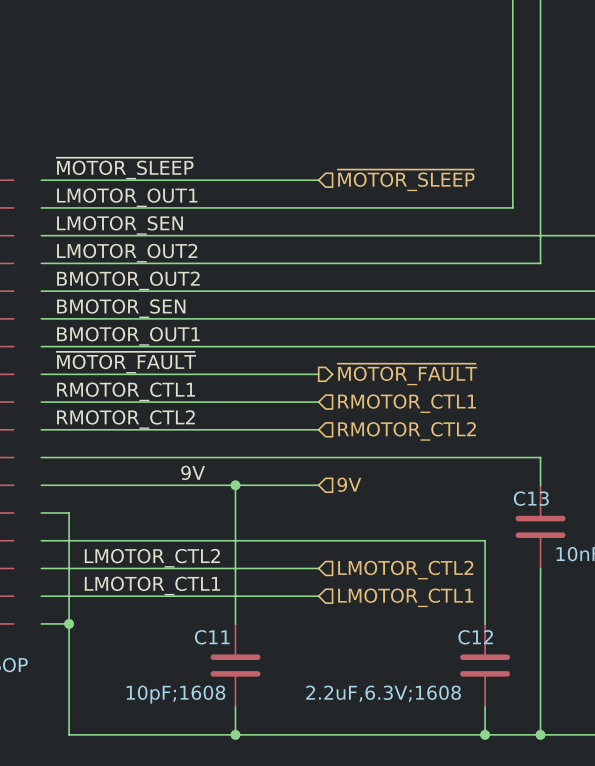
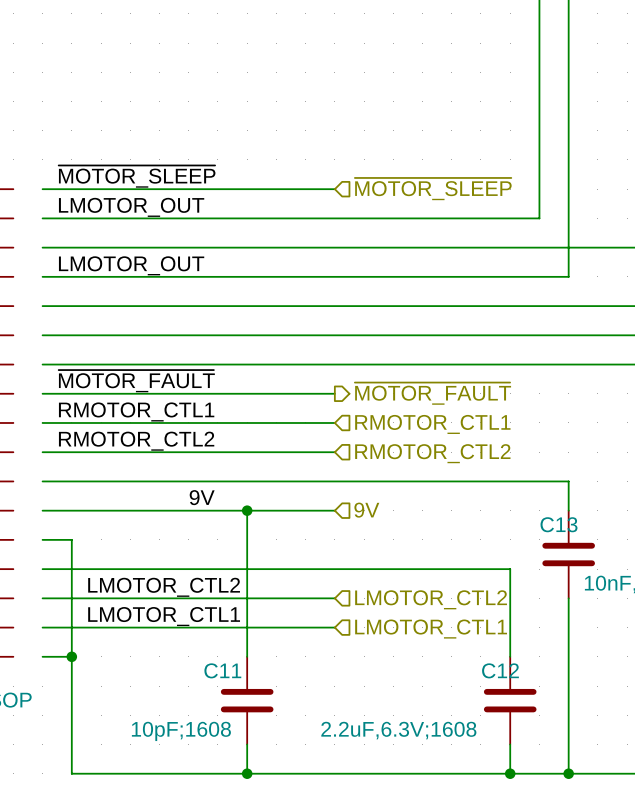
label: LMOTOR_OUT1 (127, 197) -> LMOTOR_OUT (131, 207)
label: LMOTOR_SEN (120, 225) -> none
label: LMOTOR_OUT2 (127, 253) -> LMOTOR_OUT (131, 265)
label: BMOTOR_OUT2 (128, 280) -> none
label: BMOTOR_SEN (121, 308) -> none
label: BMOTOR_OUT1 (128, 336) -> none

